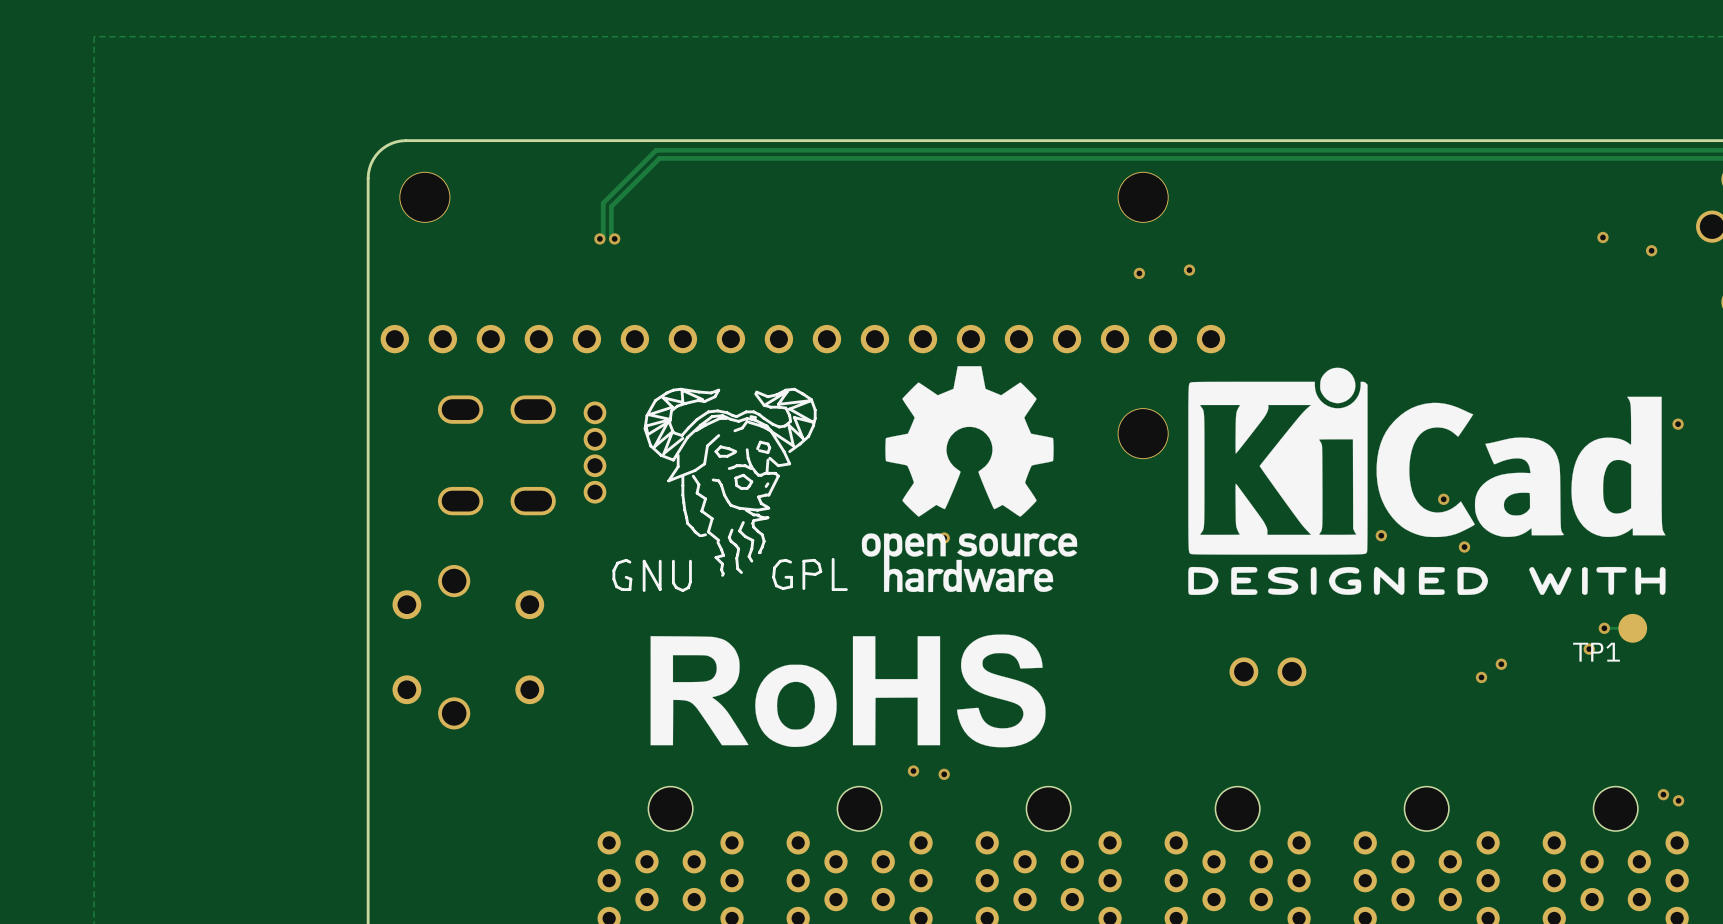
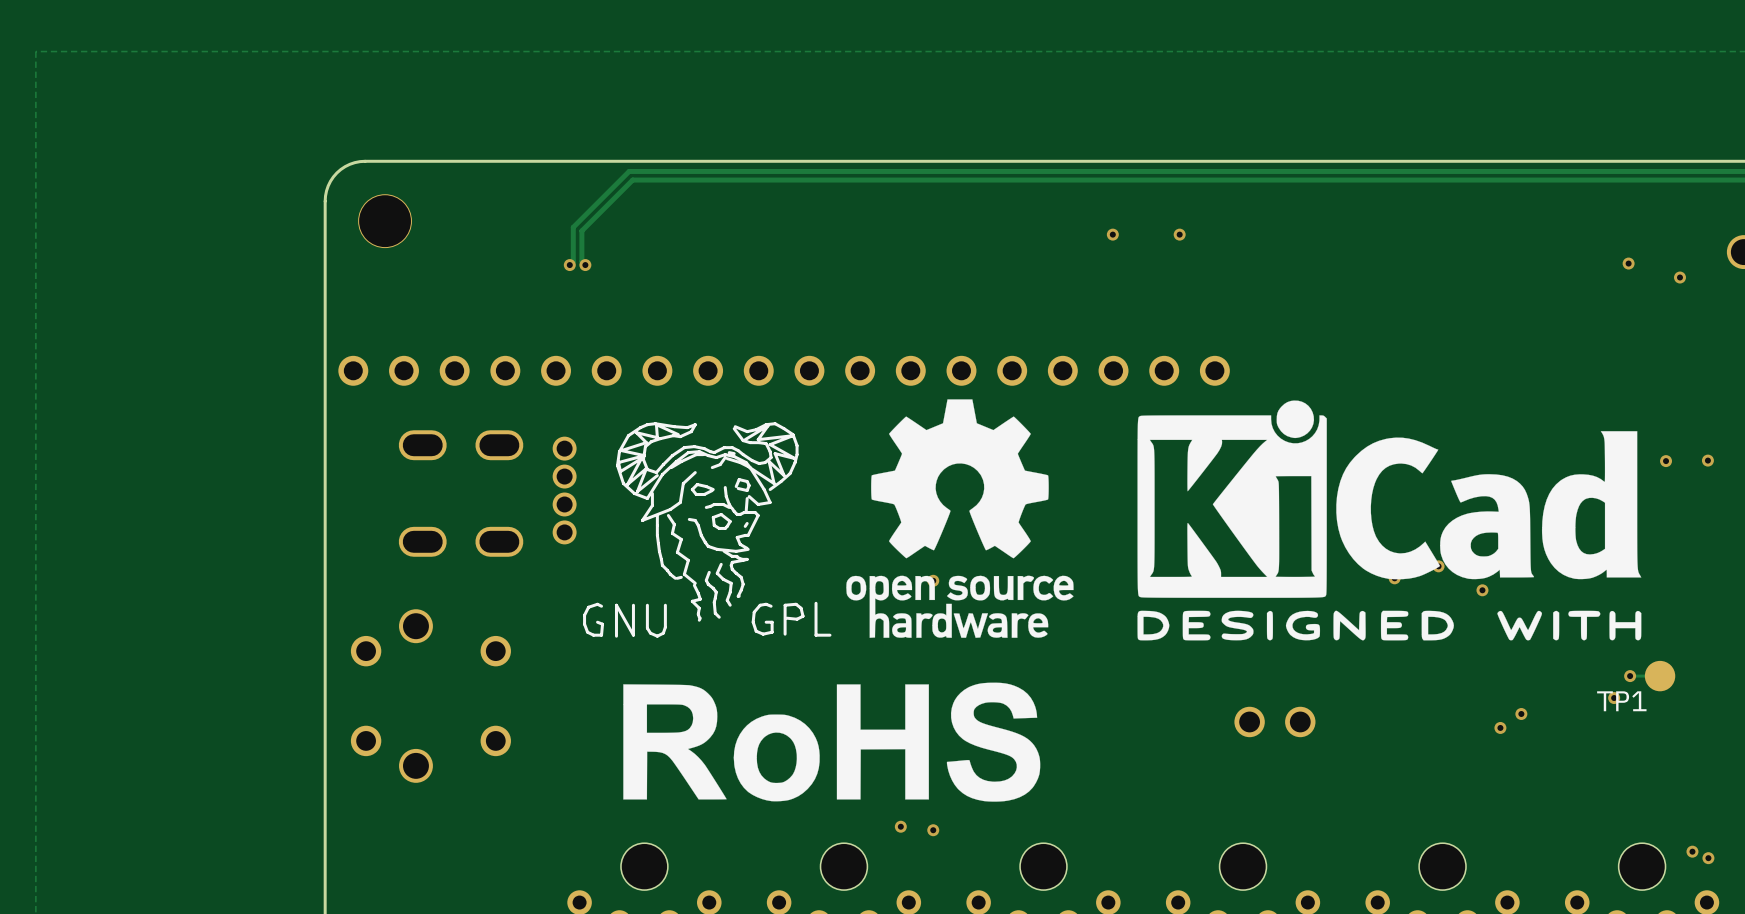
part: (1143, 197) -> none
via: none -> (1112, 234)
via: none -> (1179, 234)
via: (1189, 270) -> none
via: (1139, 273) -> none
part: (1143, 433) -> none
drawing position: (1426, 481) -> (1389, 520)

